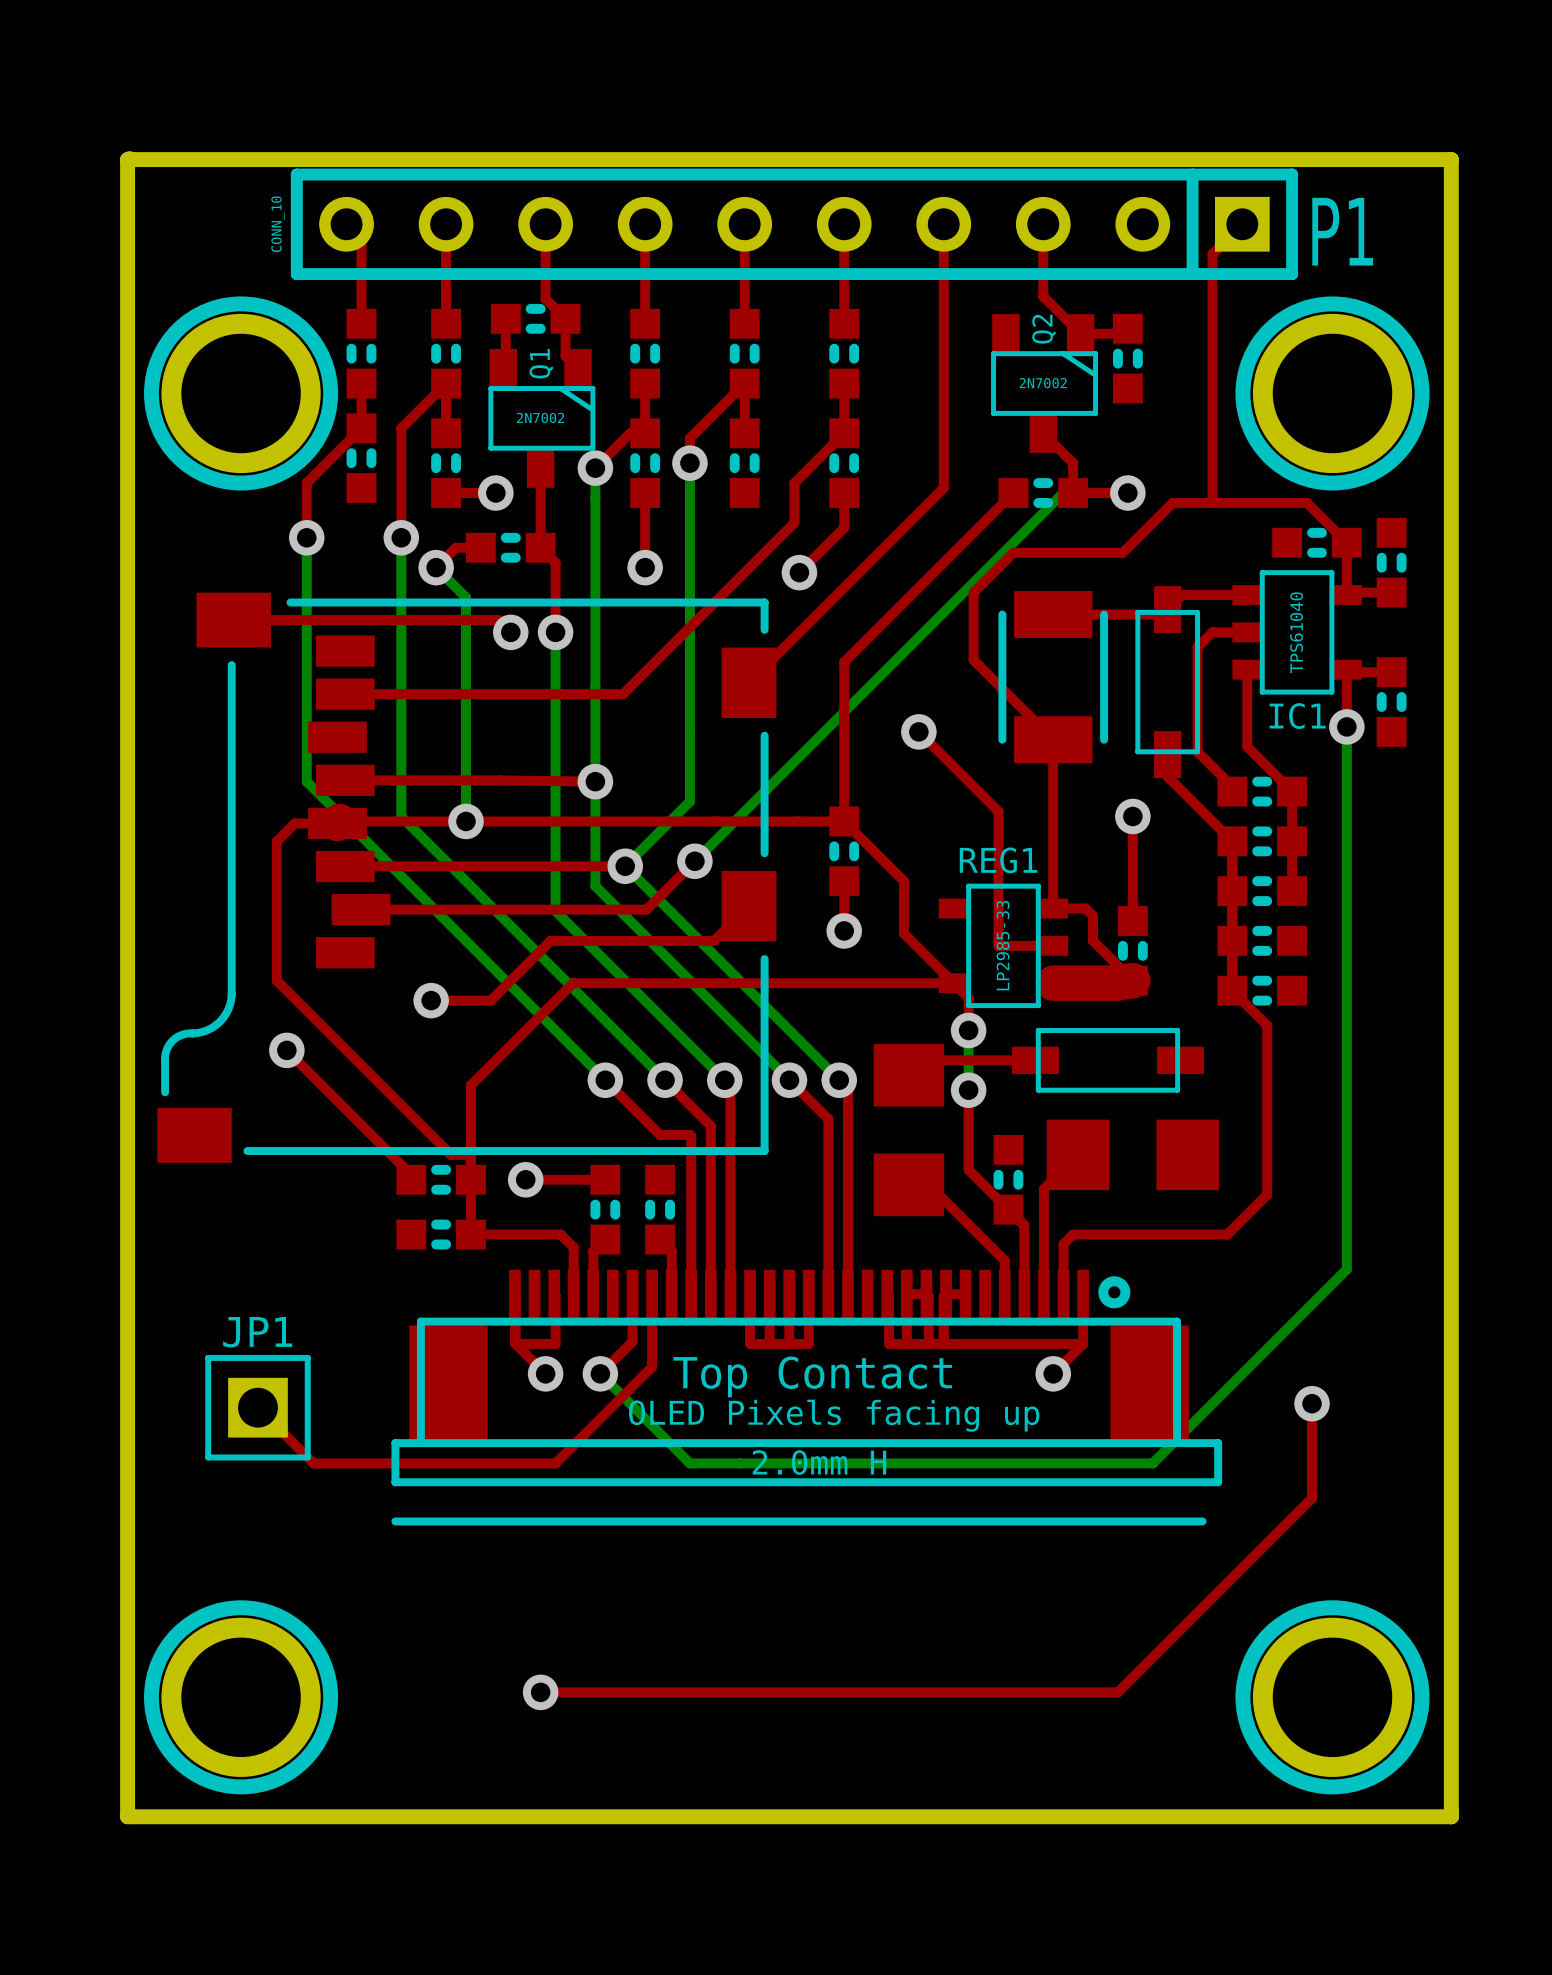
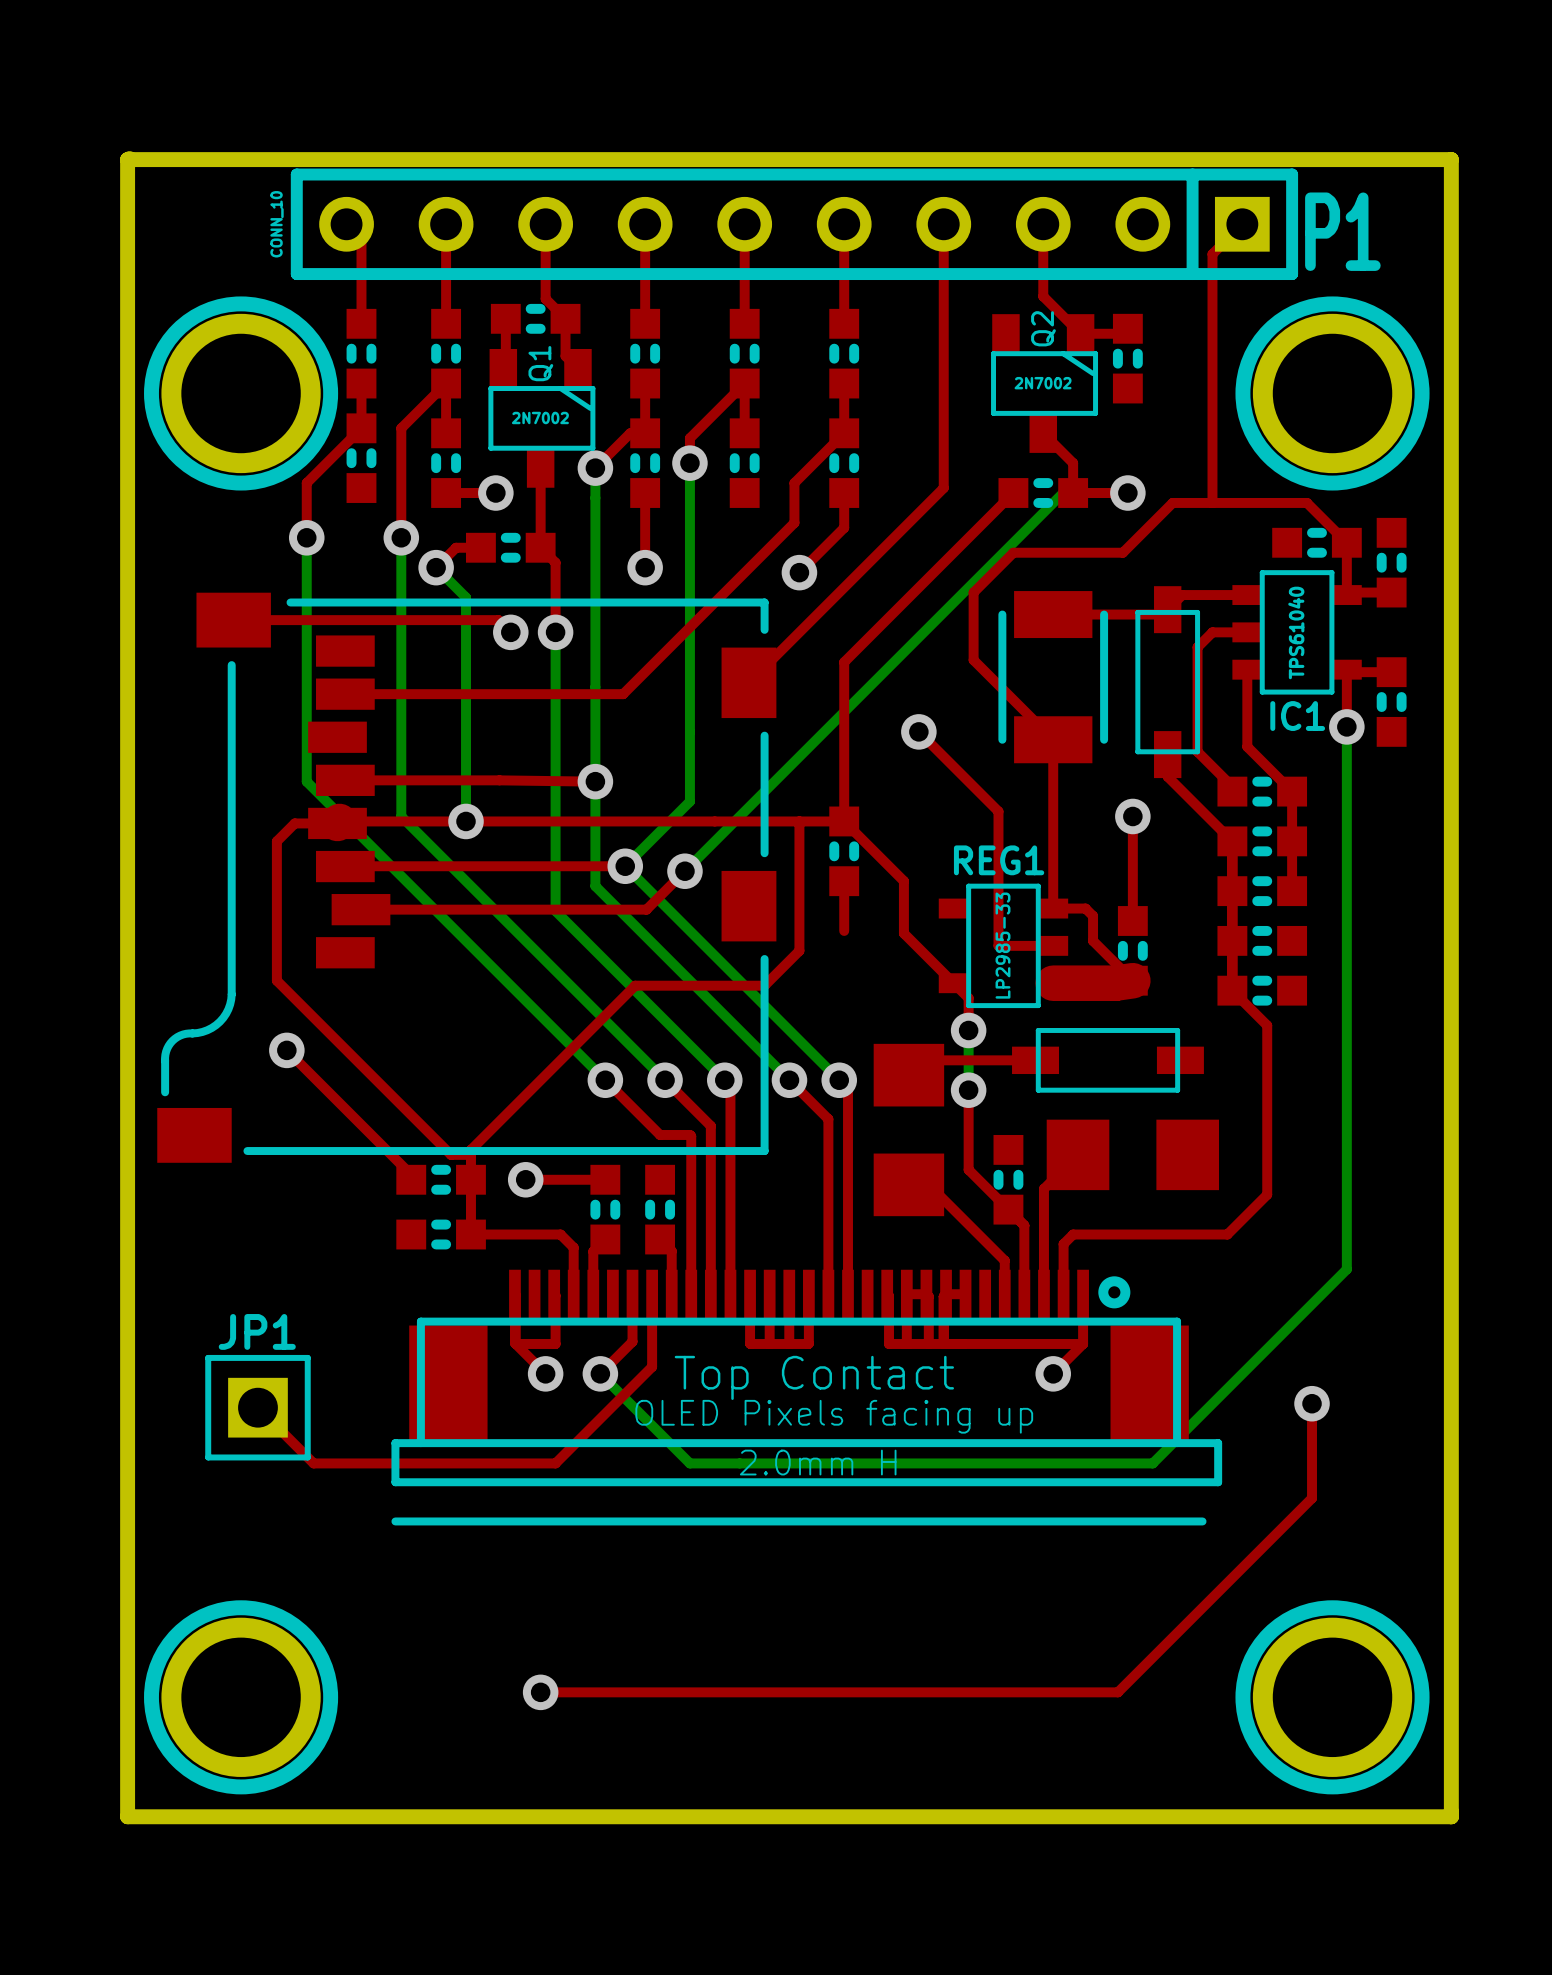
via position: (694, 861) -> (684, 871)
top track: (748, 906) (714, 940) (550, 940) (490, 1000) (431, 1000) -> none
via: (844, 930) -> none
top track: (953, 983) (572, 983) (470, 1085) (470, 1149) -> (799, 821) (799, 950) (764, 985) (635, 985) (470, 1149)
via: (431, 1000) -> none

